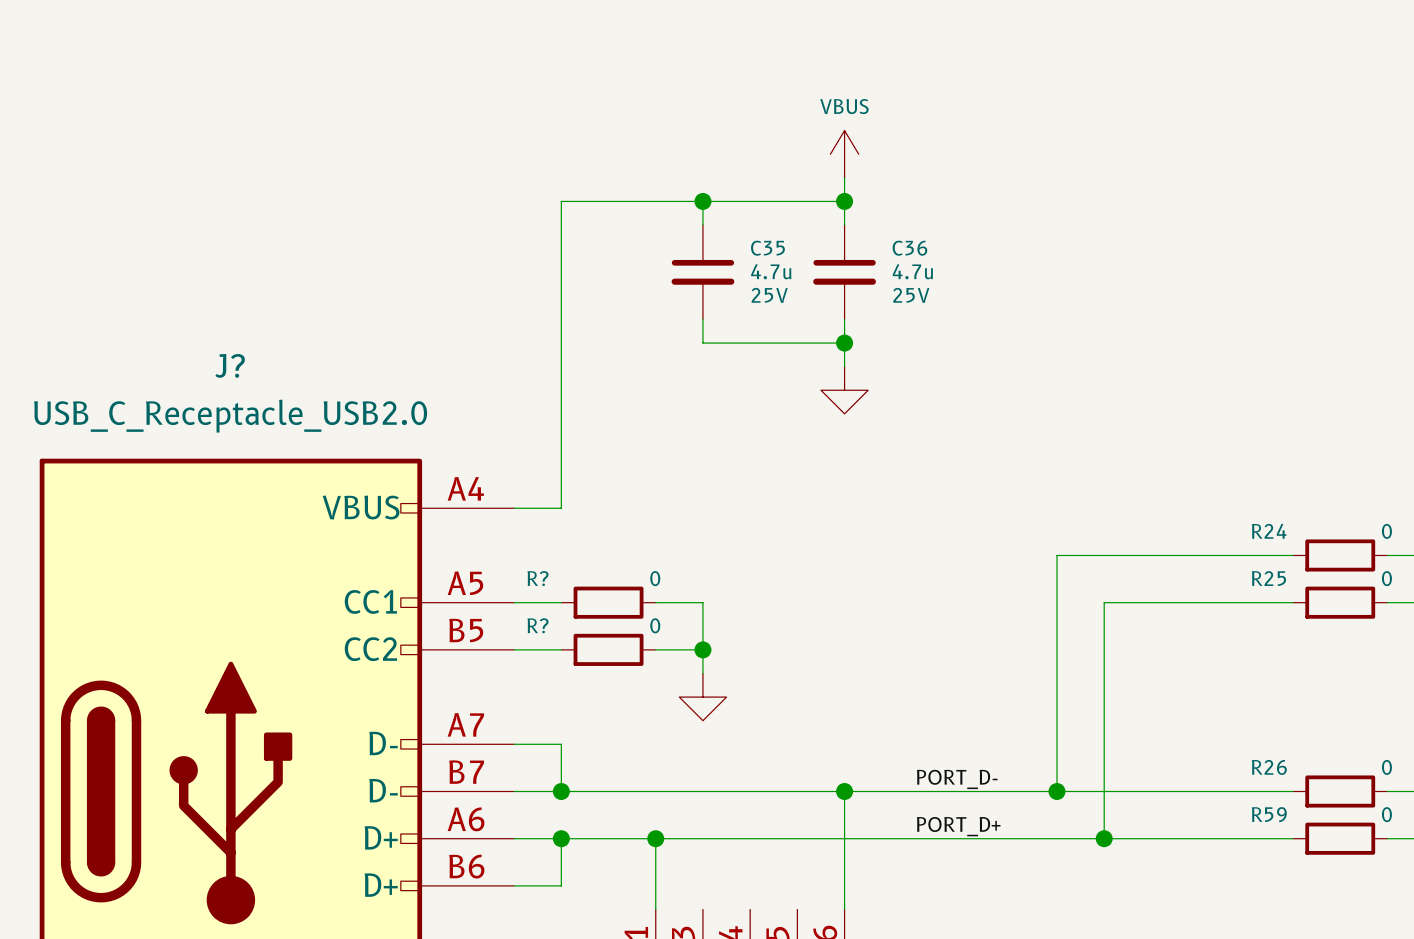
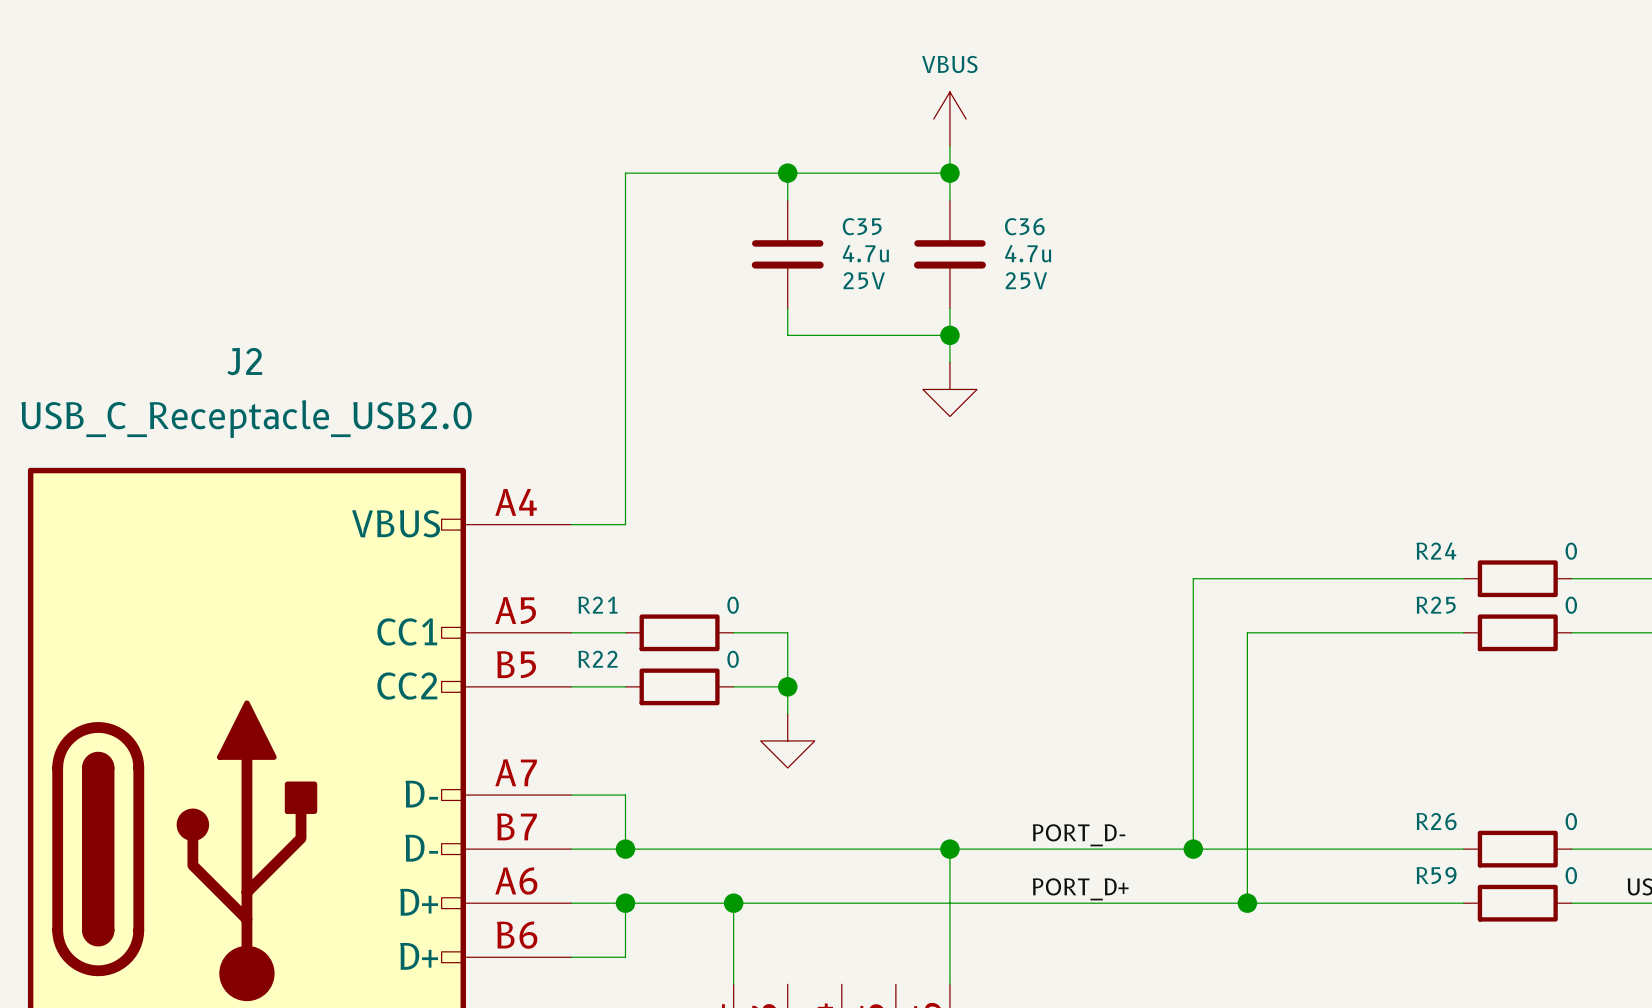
J? name: J? (230, 365) -> J2 (244, 361)
R? name: R? (538, 578) -> R21 (597, 605)
R? name: R? (538, 625) -> R22 (597, 659)

